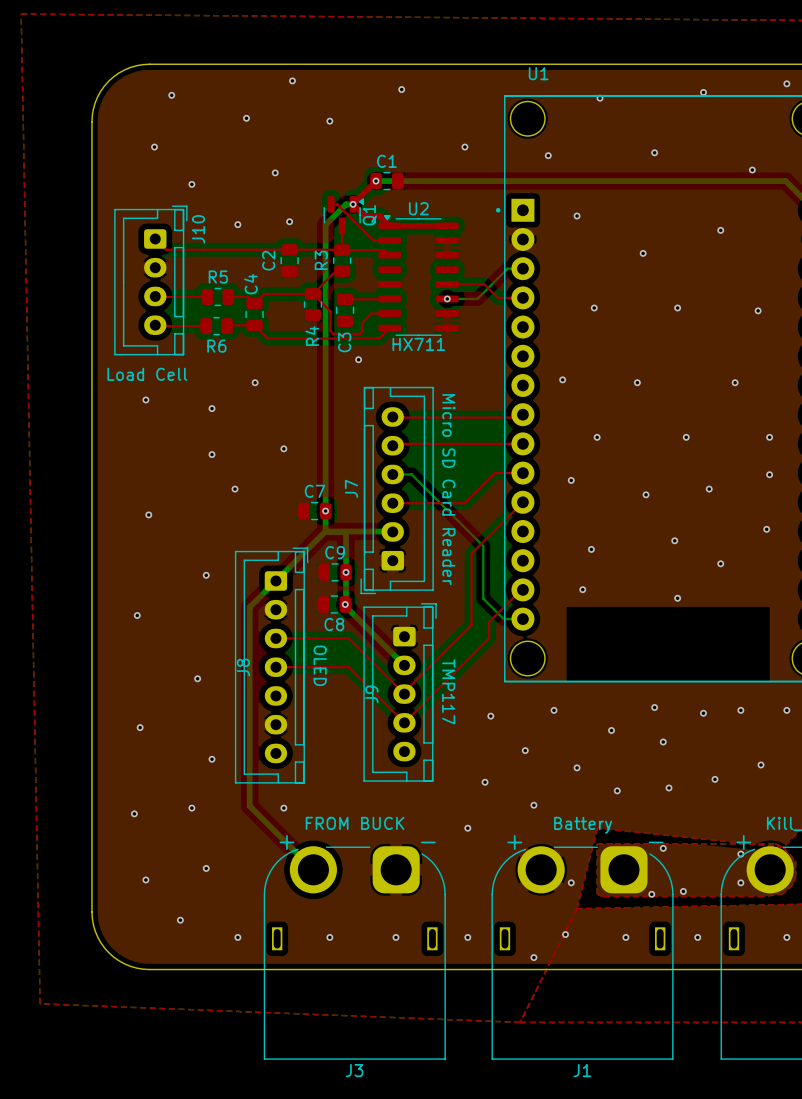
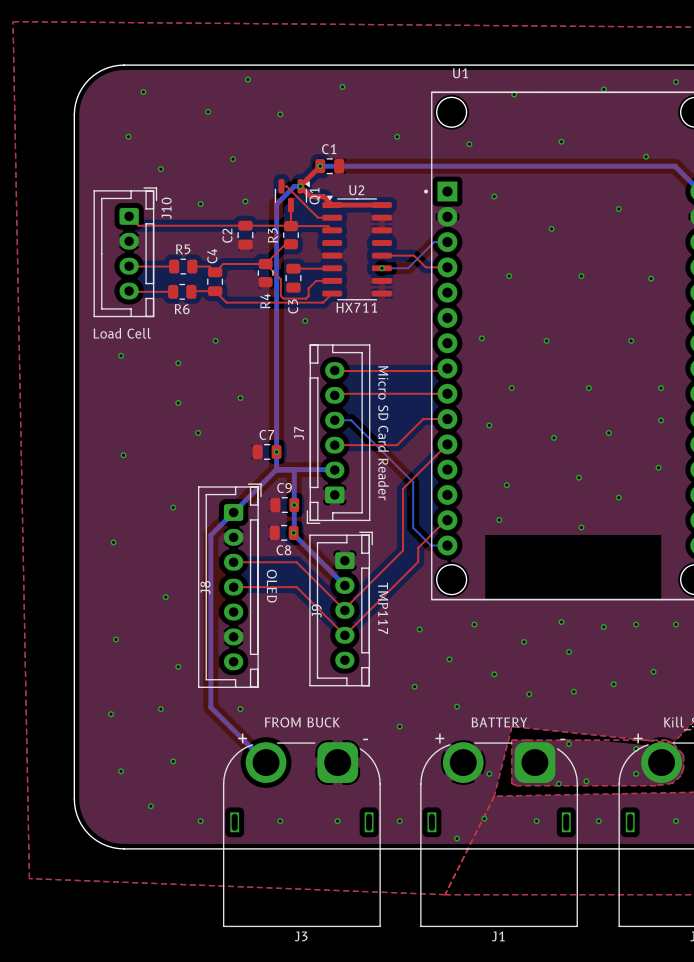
J1 value: Battery (583, 825) -> BATTERY (499, 722)

